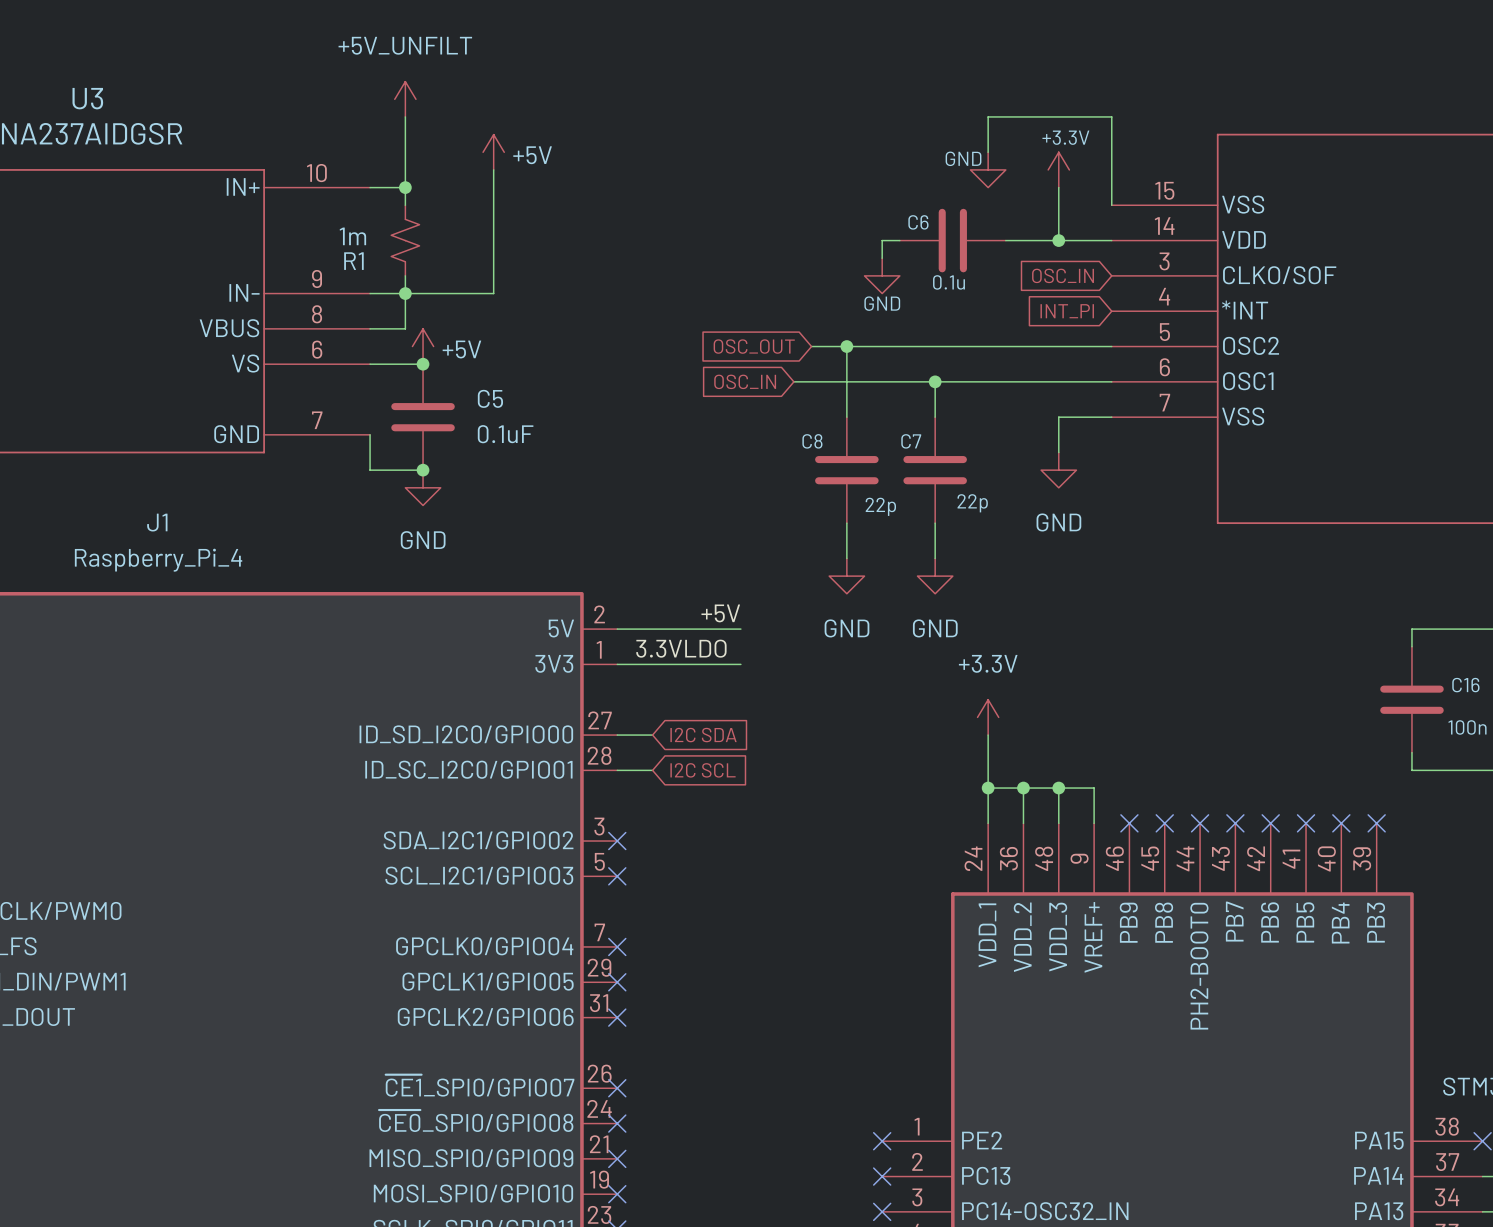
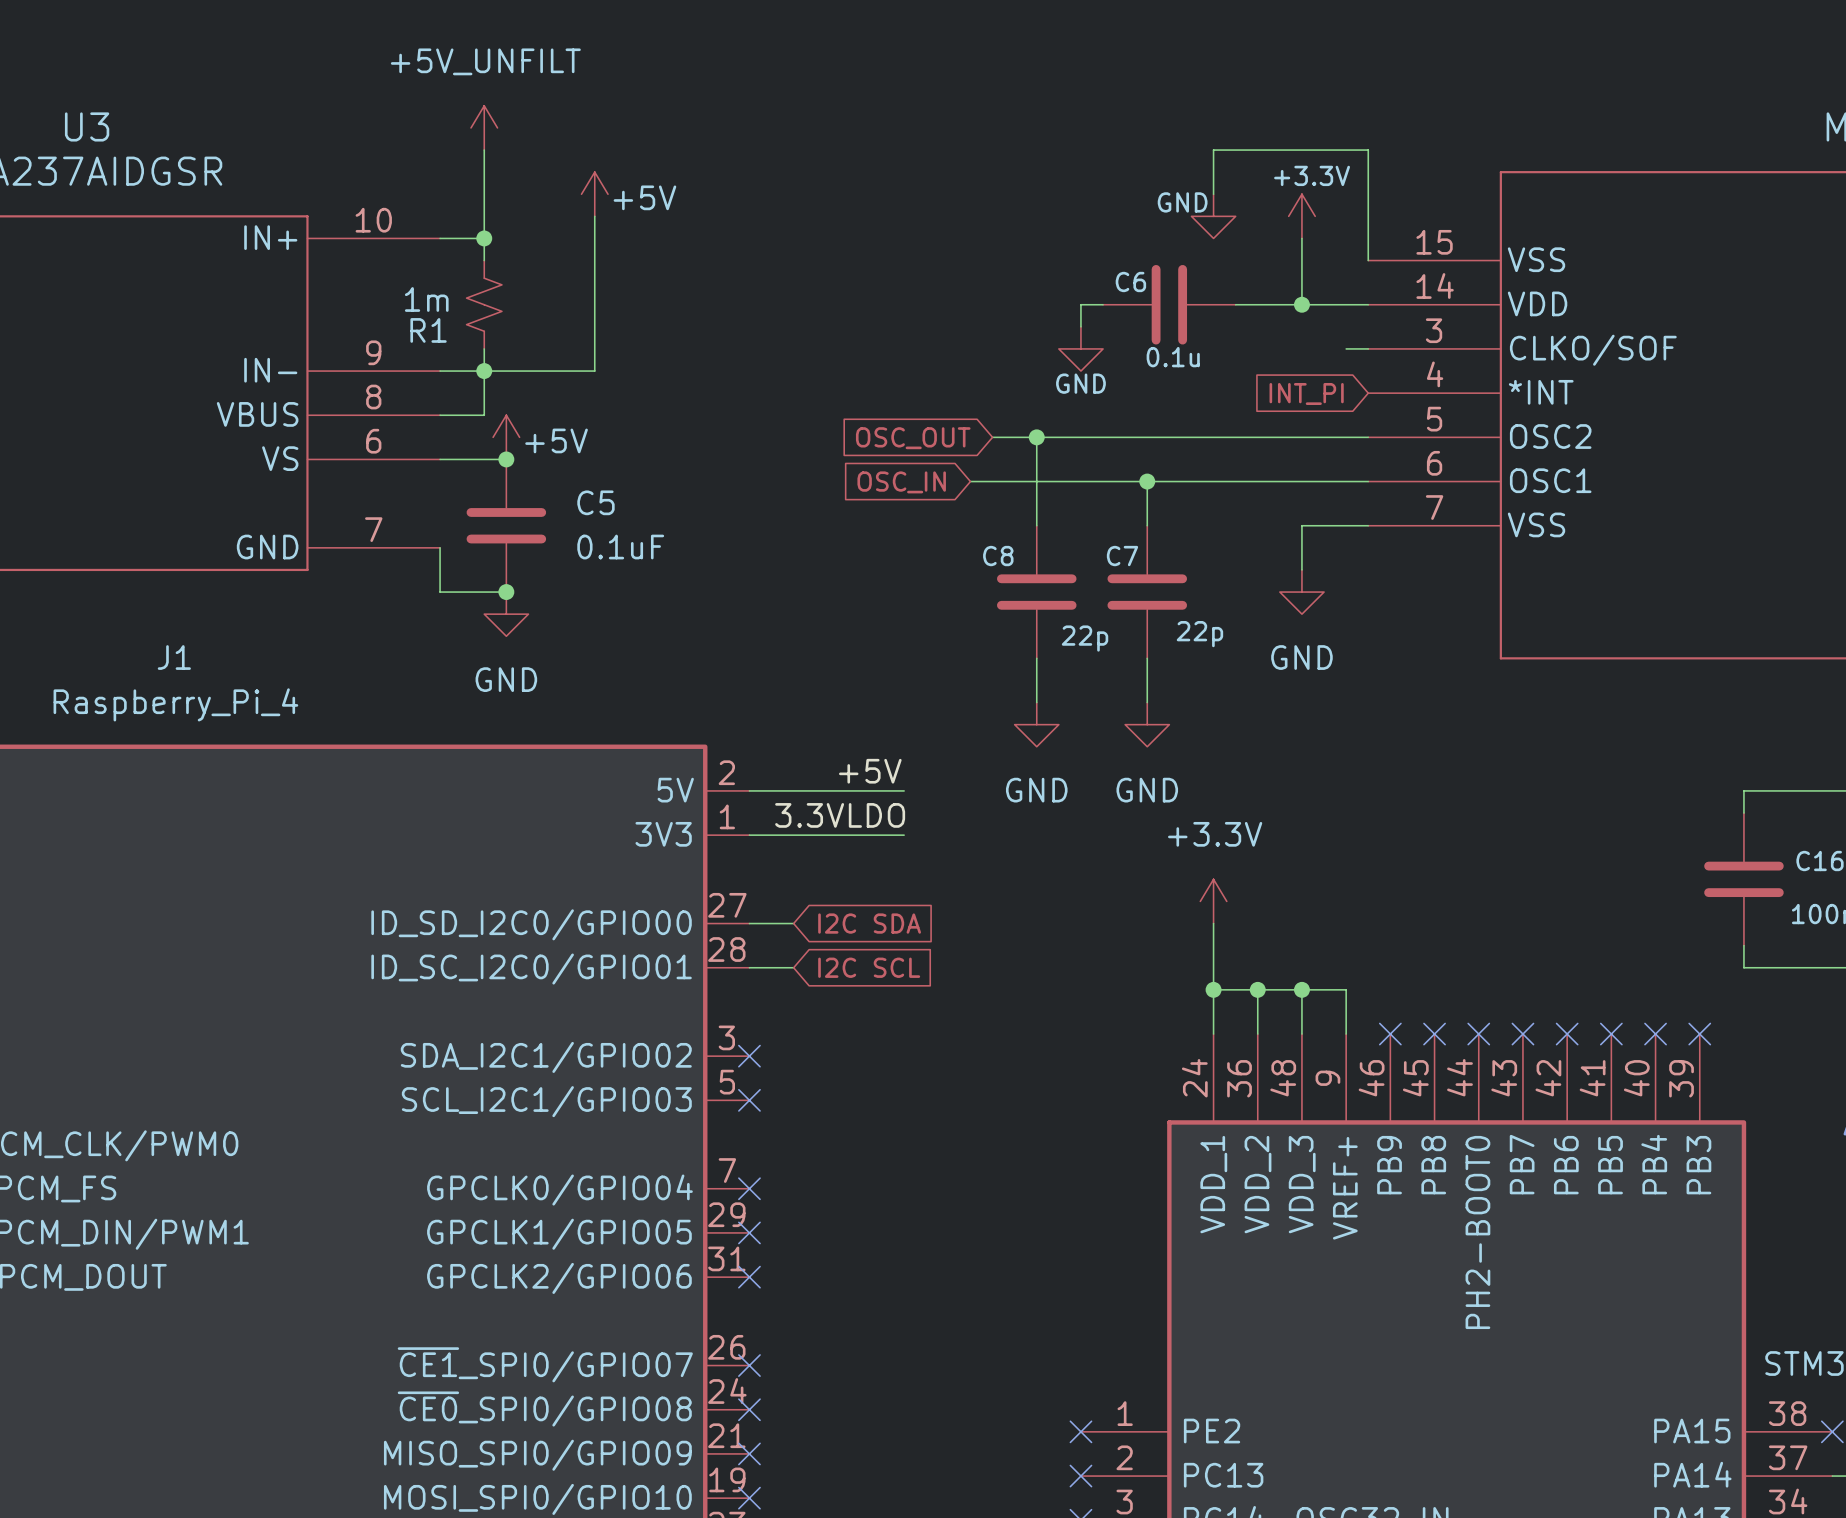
global label: OSC_IN (1063, 275) -> none
wire: none -> (1346, 348) (1368, 348)

